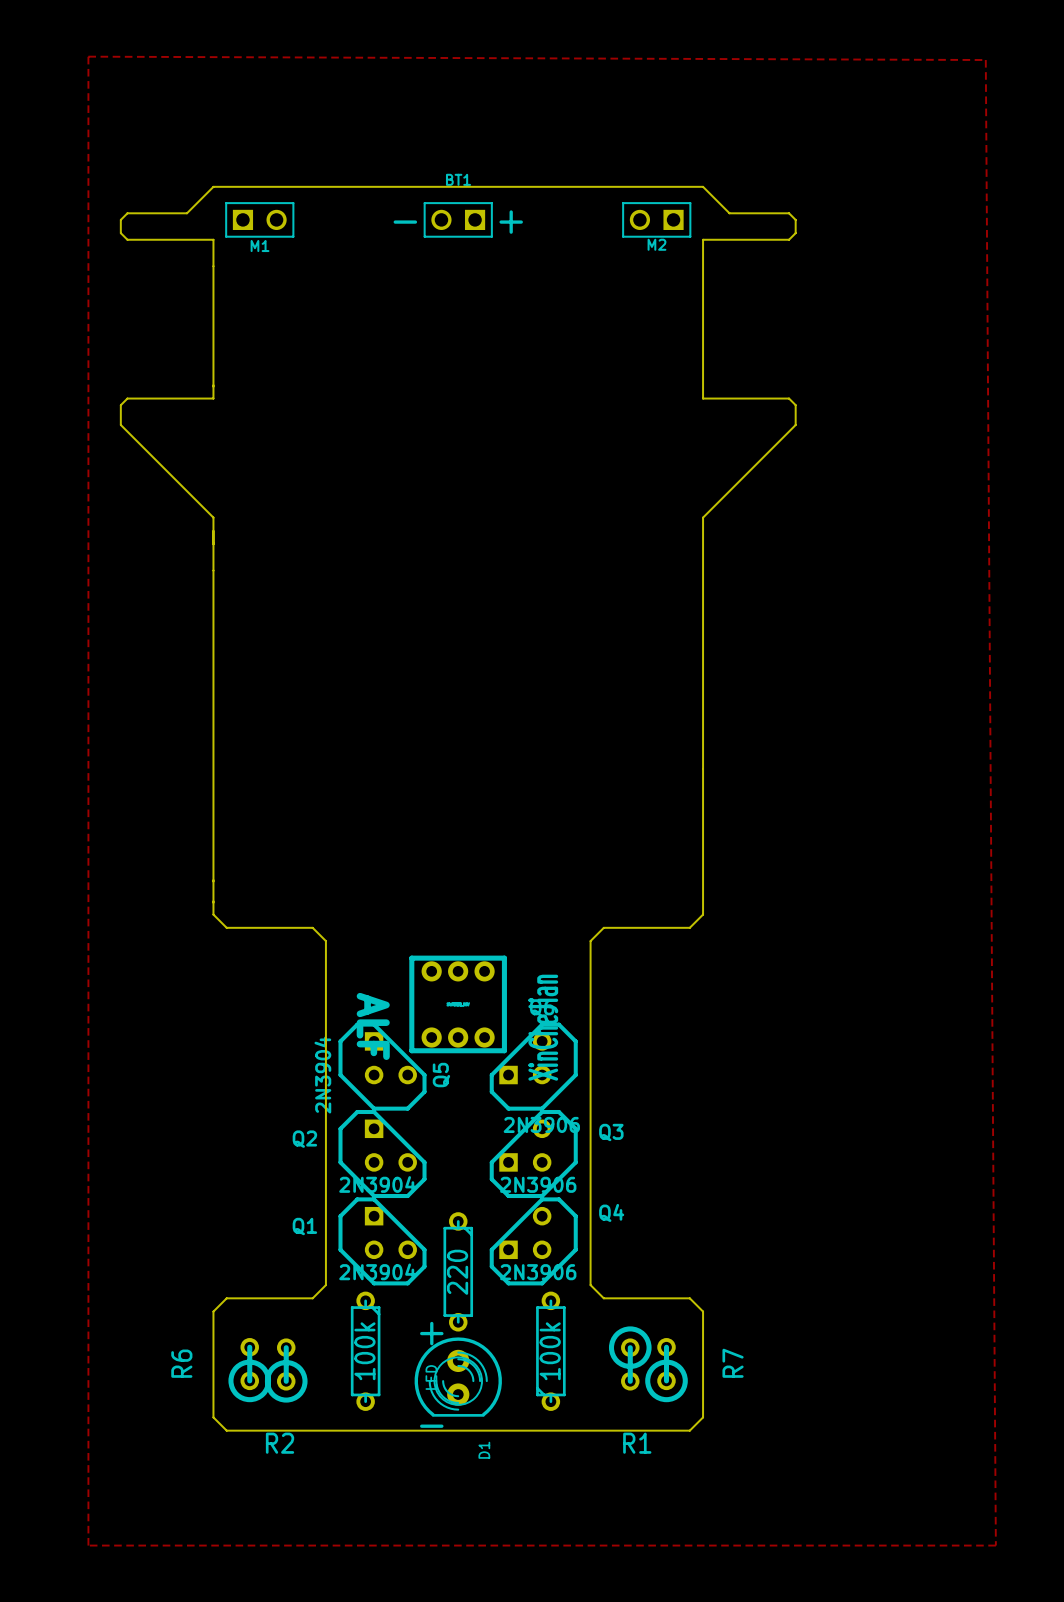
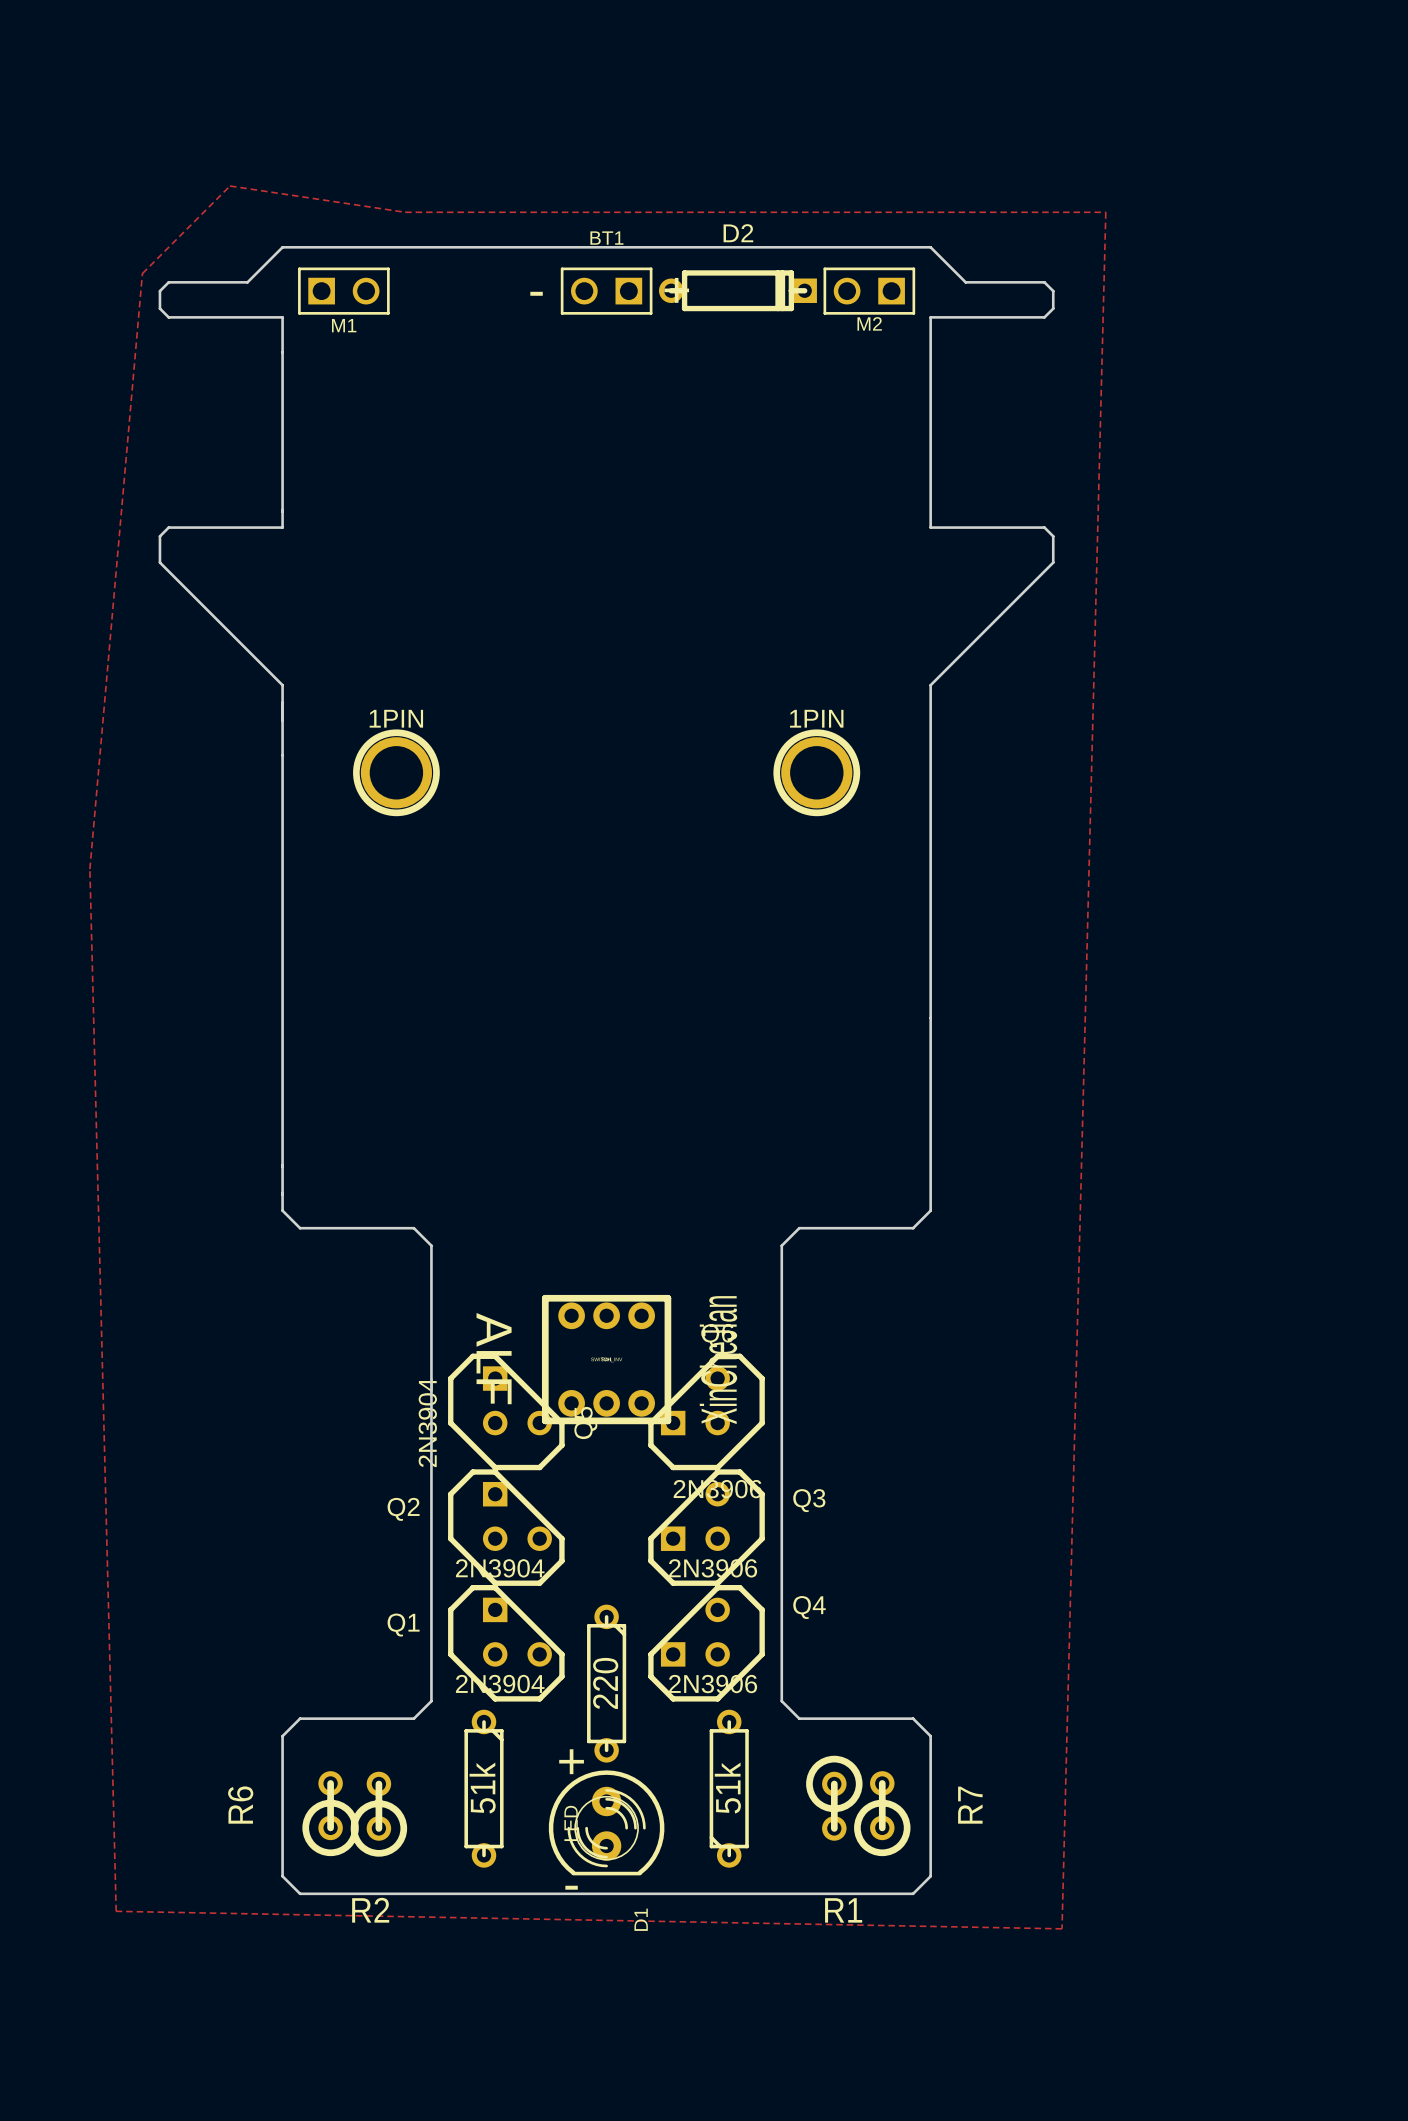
zone outline: (88, 56) (88, 1545) (995, 1545) (985, 60) (88, 56) -> (230, 186) (142, 273) (89, 869) (116, 1911) (1062, 1928) (1105, 212) (405, 212) (230, 186)
D2: none -> (737, 290)
1PIN: none -> (396, 772)
1PIN: none -> (816, 772)
part position: (458, 1004) -> (606, 1359)
part value: 100k (364, 1351) -> 51k (482, 1788)
part value: 100k (550, 1351) -> 51k (727, 1788)

